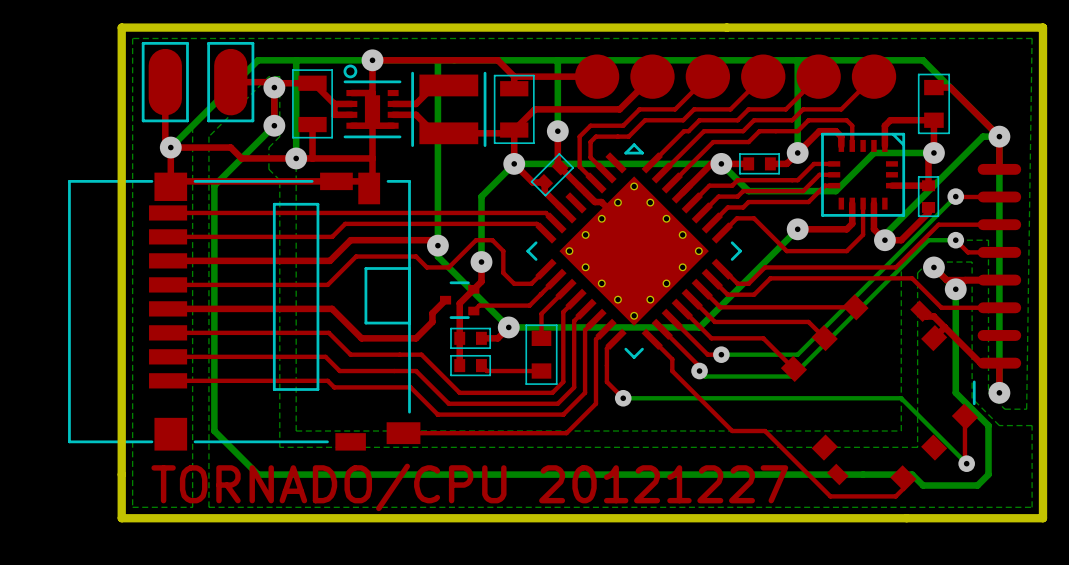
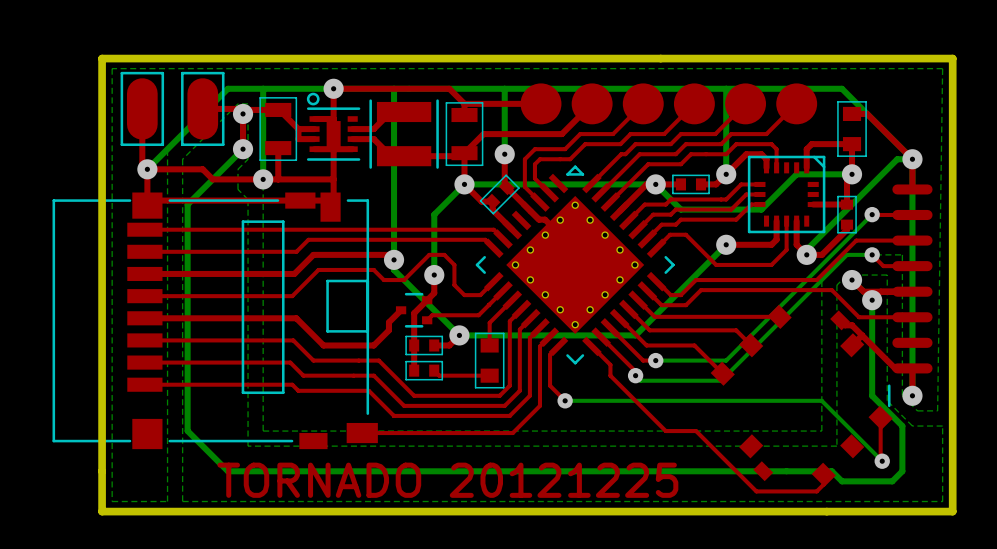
text: TORNADO/CPU 20121227 (469, 487) -> TORNADO 20121225 (447, 480)

